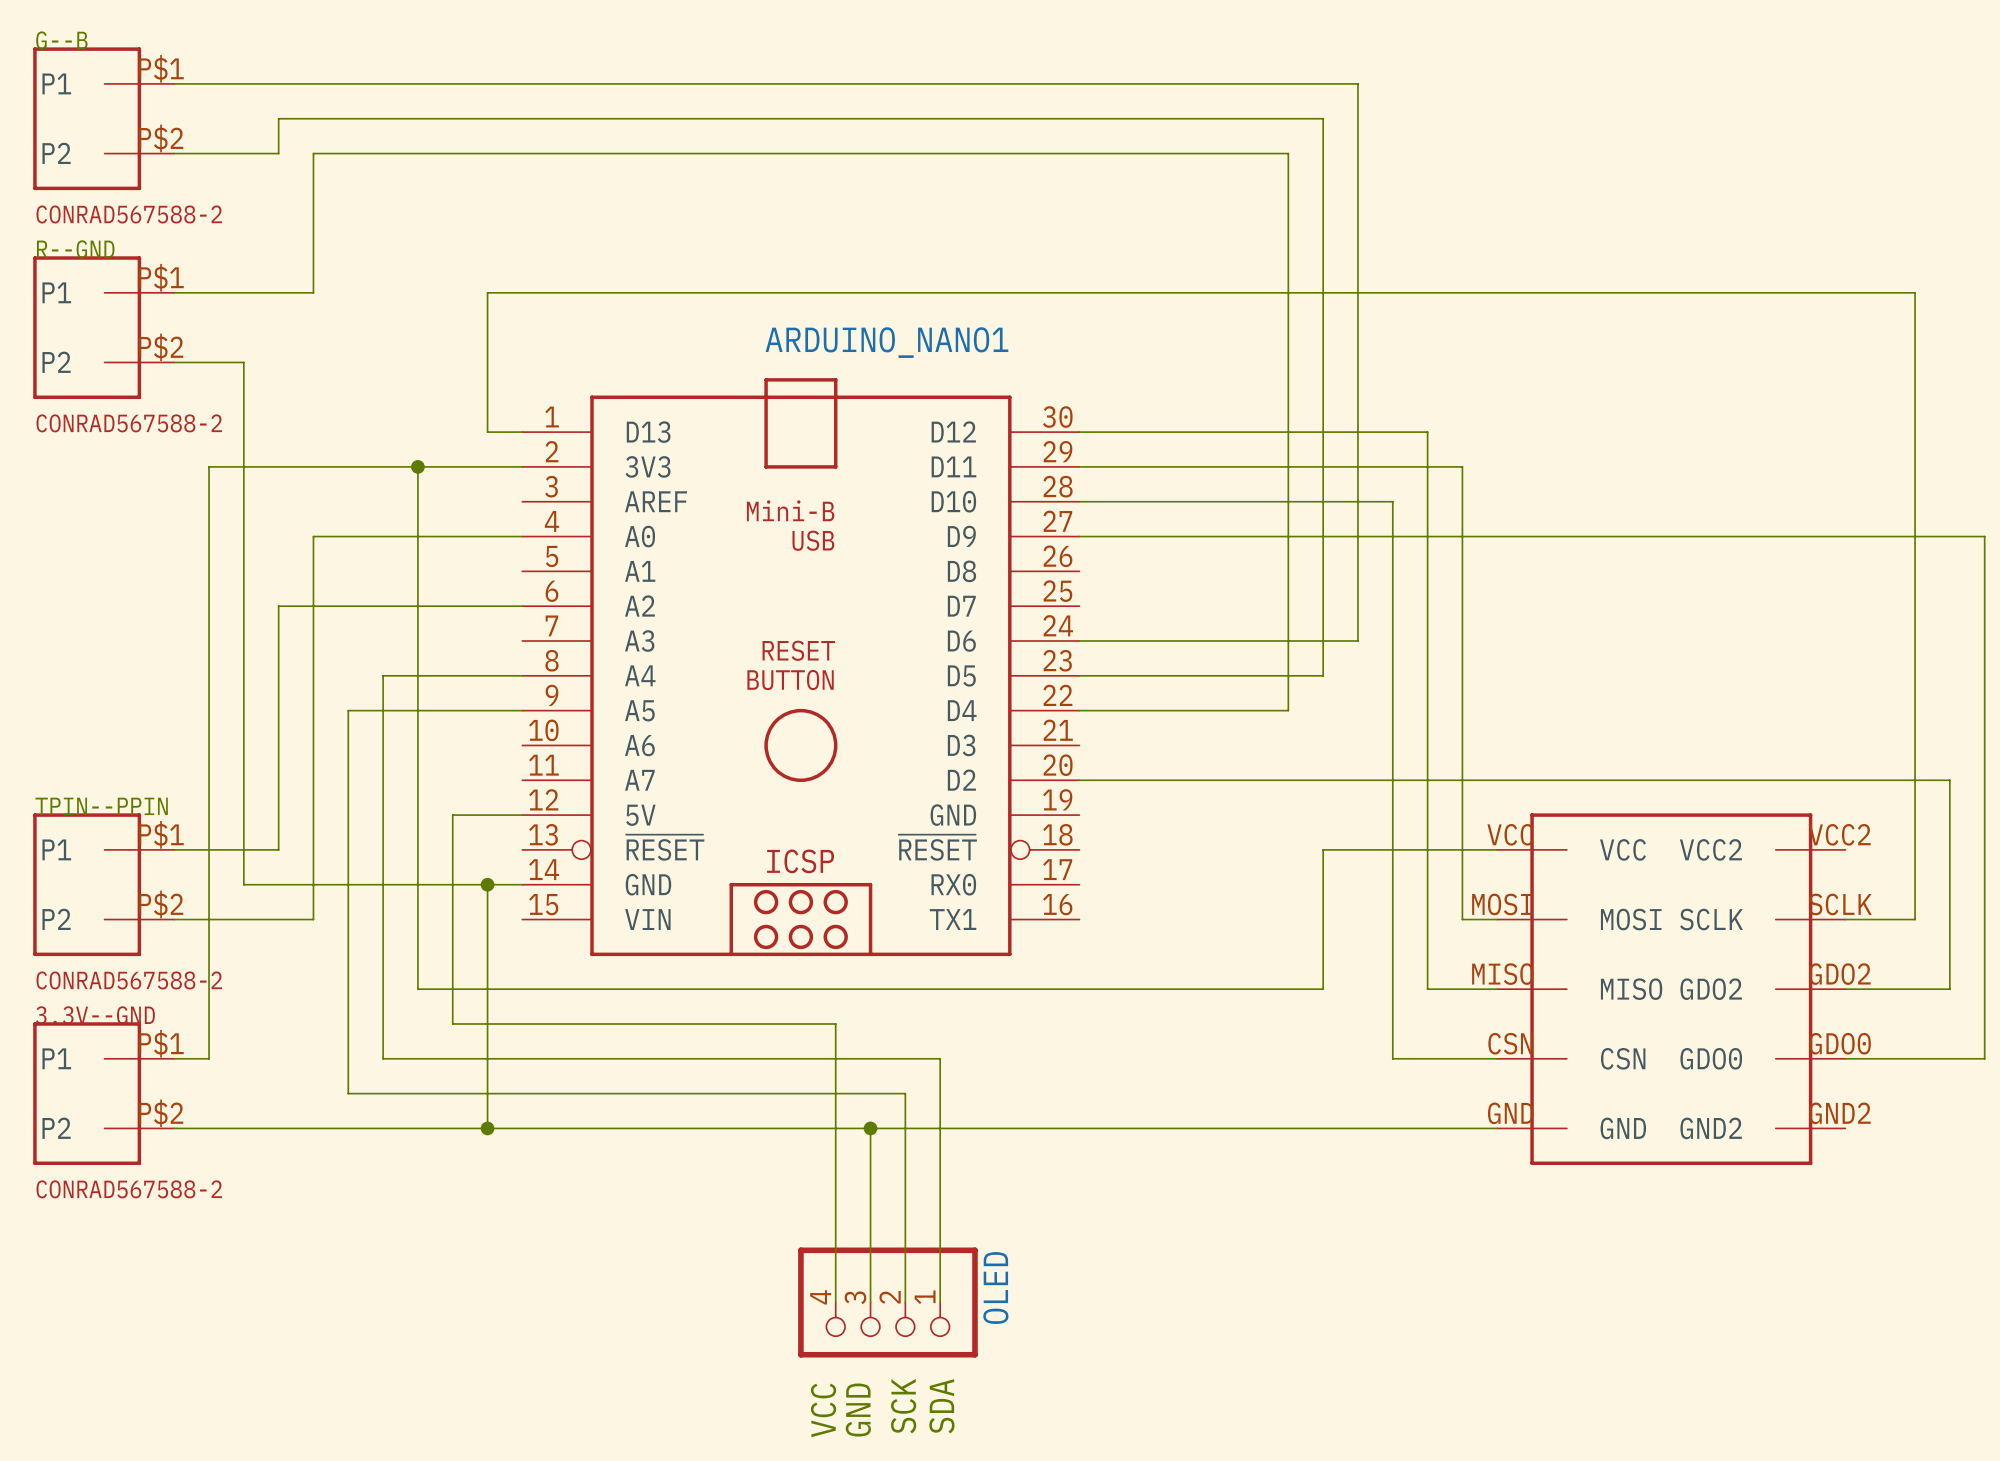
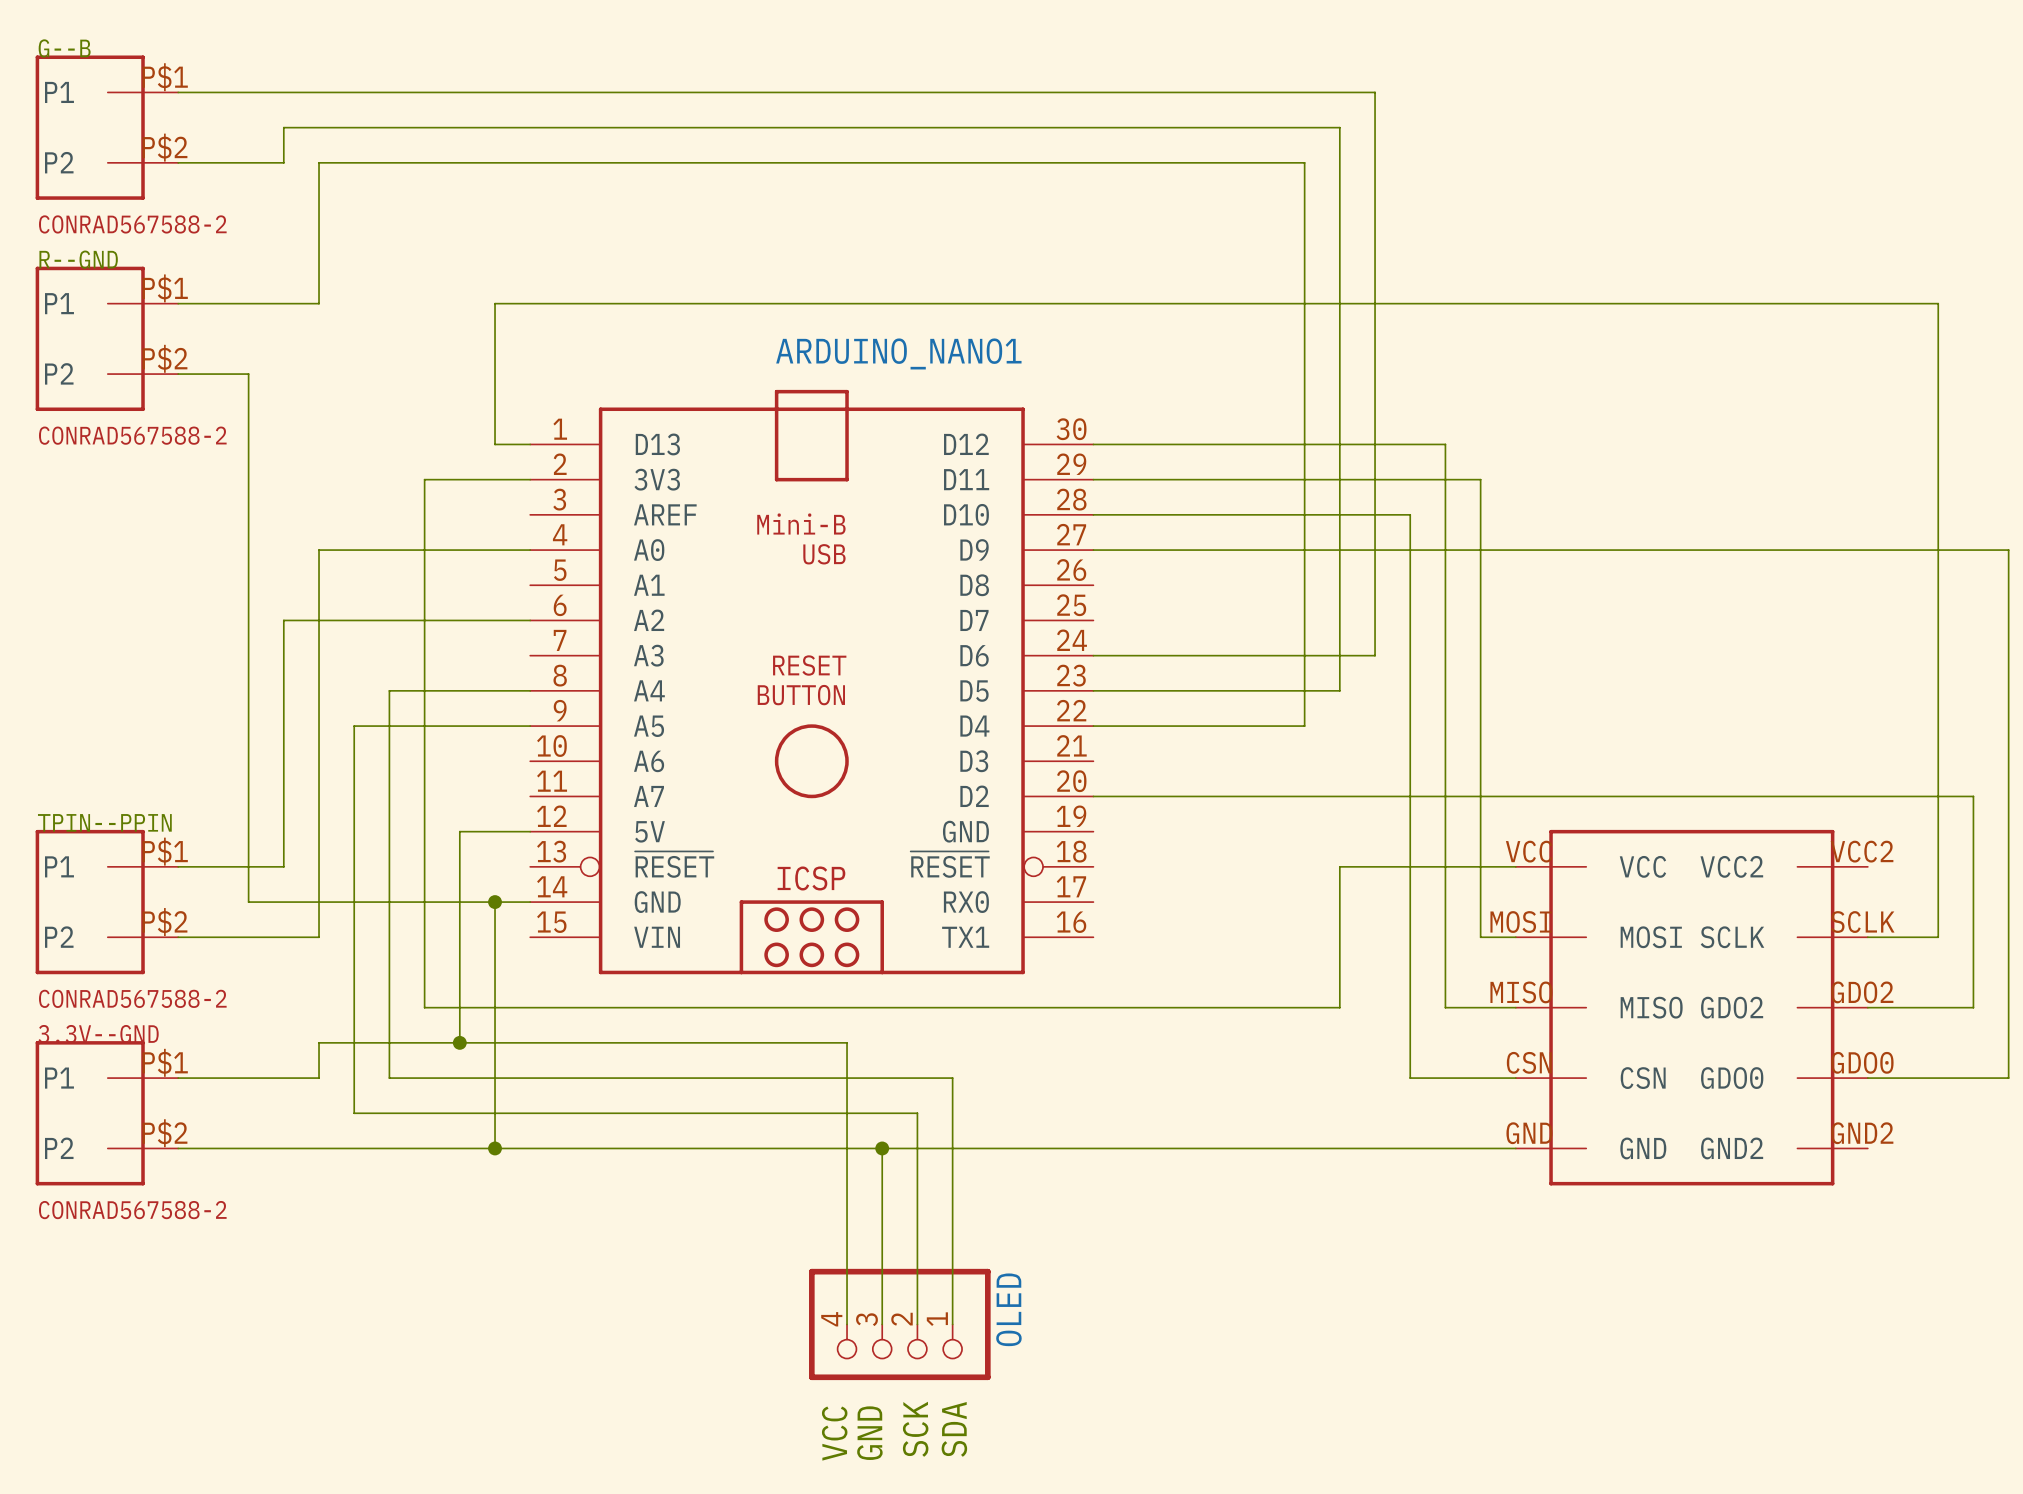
wire: (417, 466) (209, 466) (209, 1058) -> (459, 1042) (319, 1042) (319, 1078) (213, 1078)
junction: (417, 466) -> none
junction: none -> (459, 1042)

